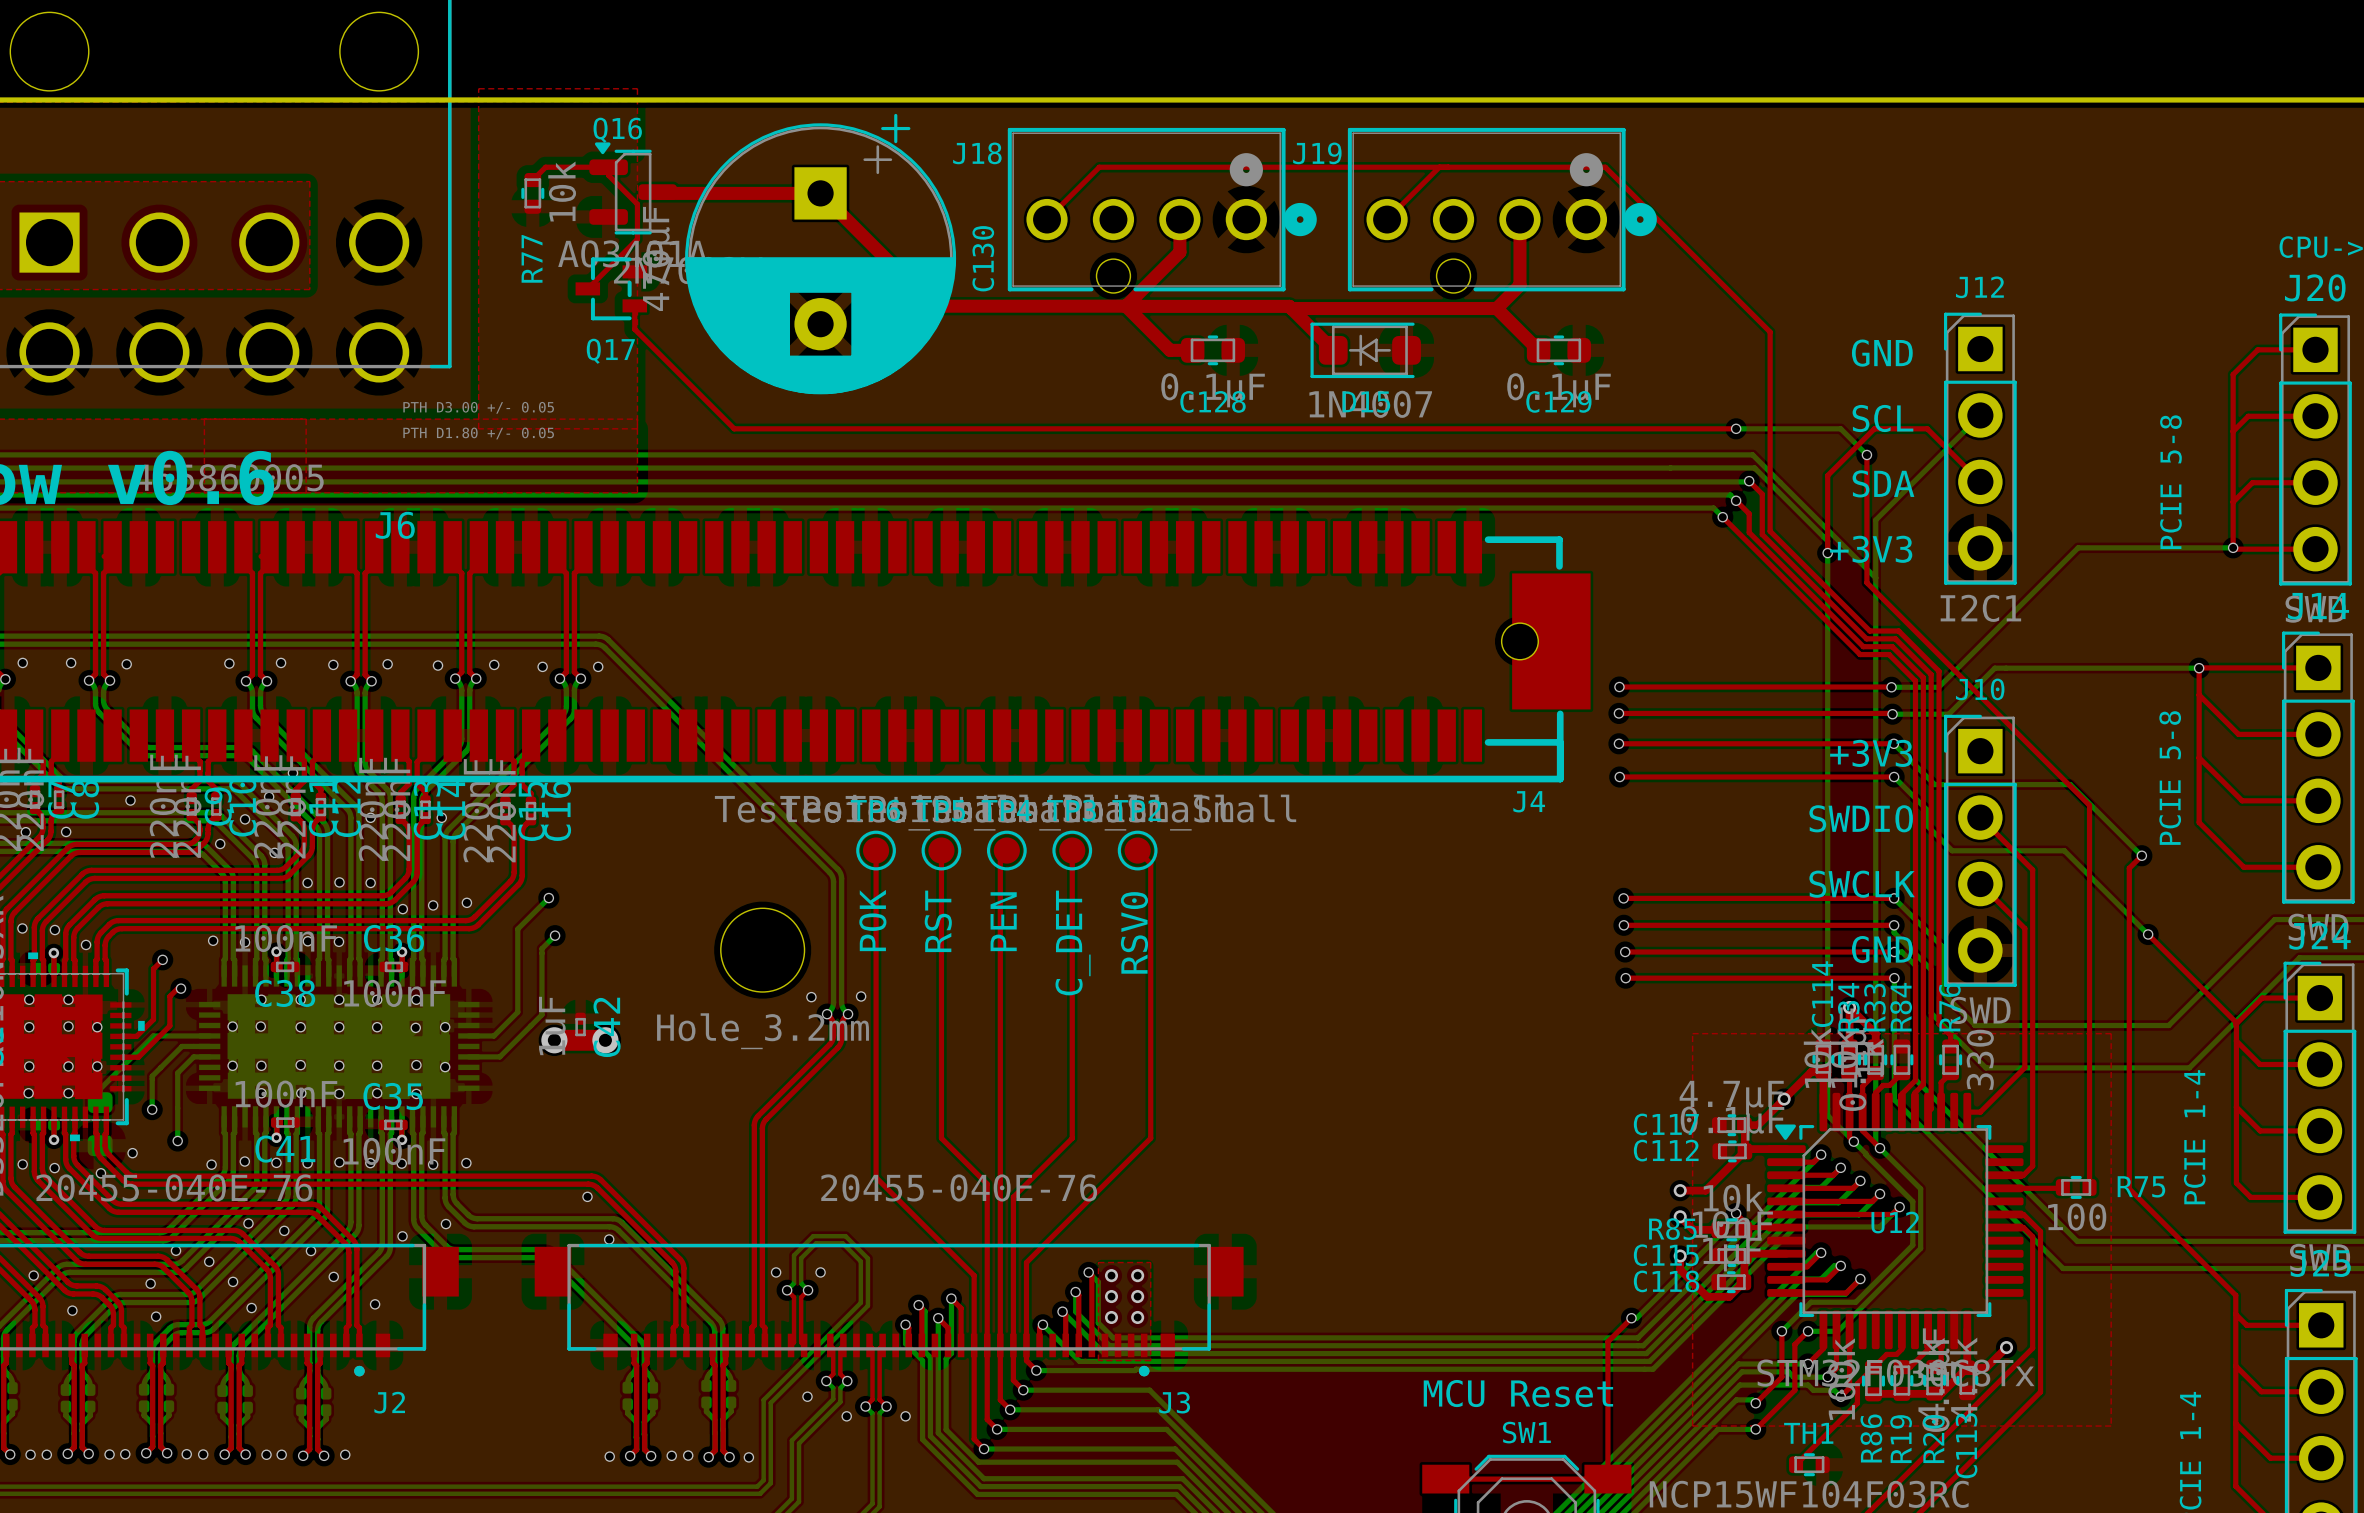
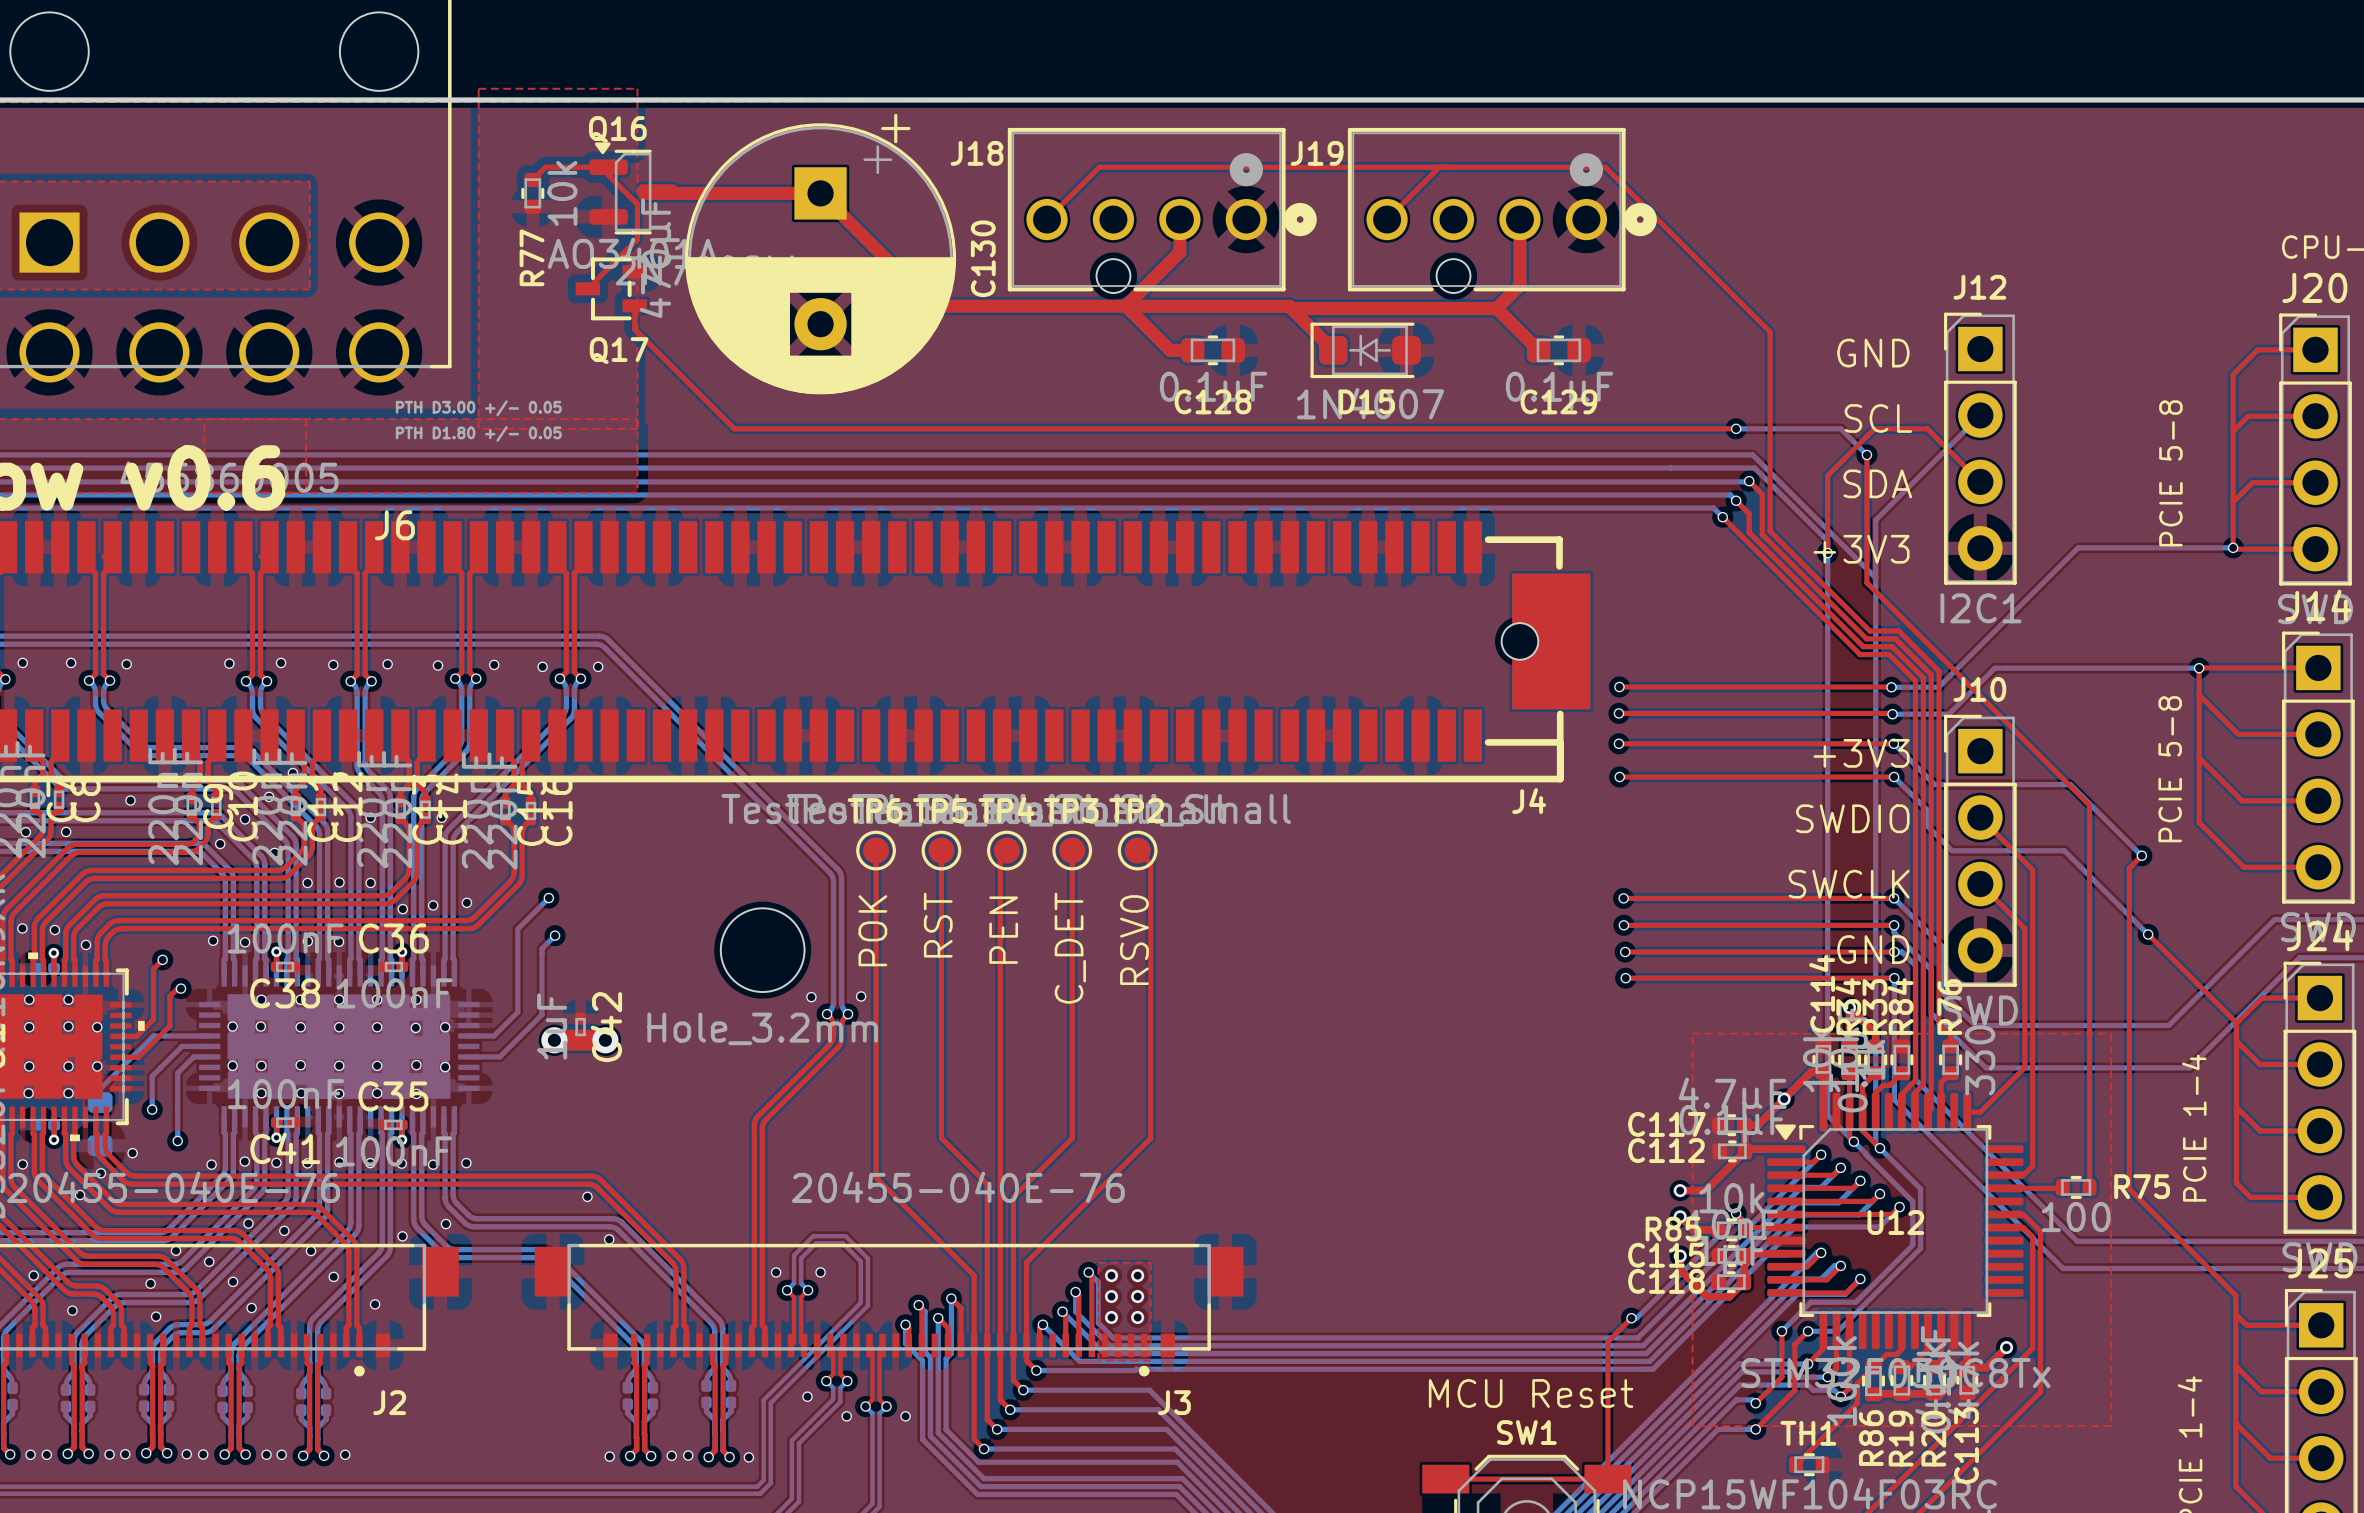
via position: (54, 1168) -> (80, 1195)

